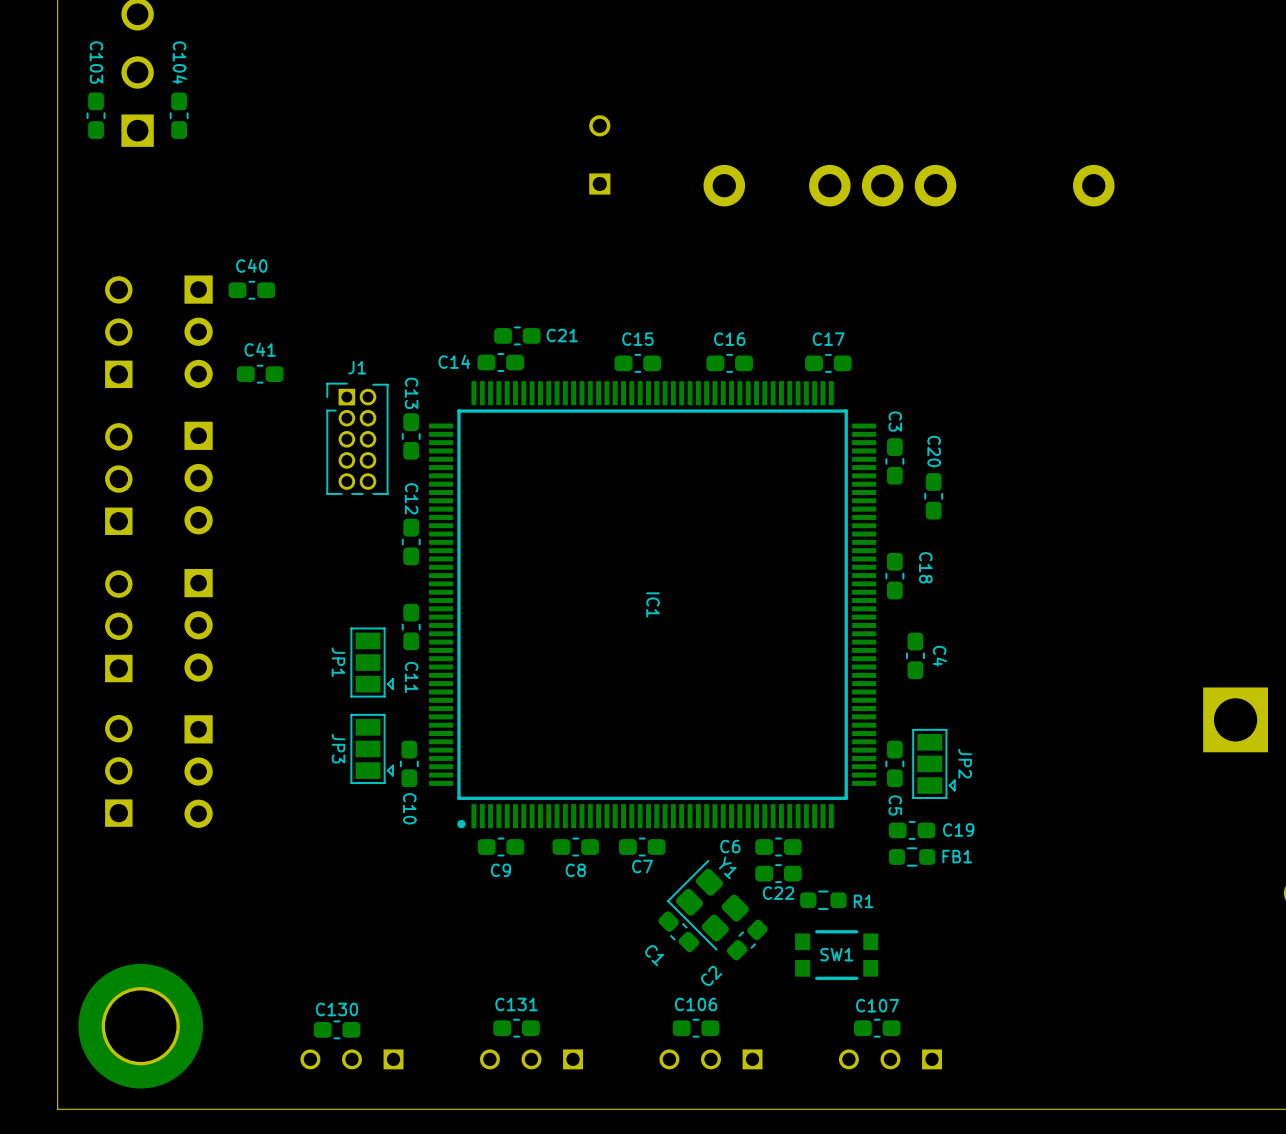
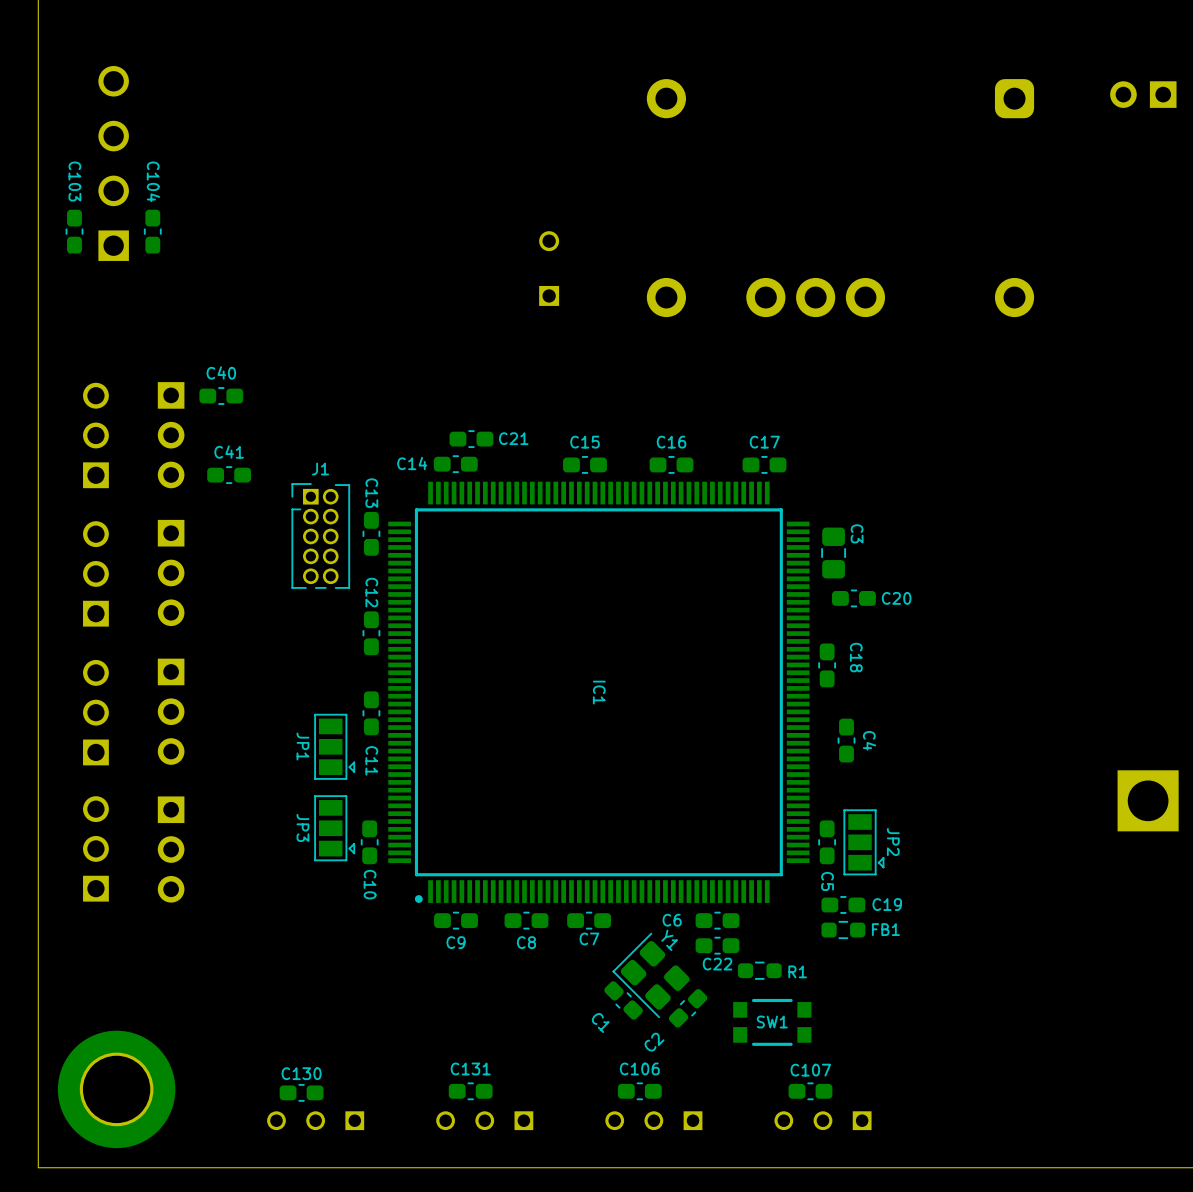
C3 name position: C3 (895, 421) -> C3 (857, 533)
C3 footprint: [885, 438, 905, 485] -> [821, 527, 847, 579]
C20 rotation: 0° (933, 496) -> 90° clockwise (853, 598)

